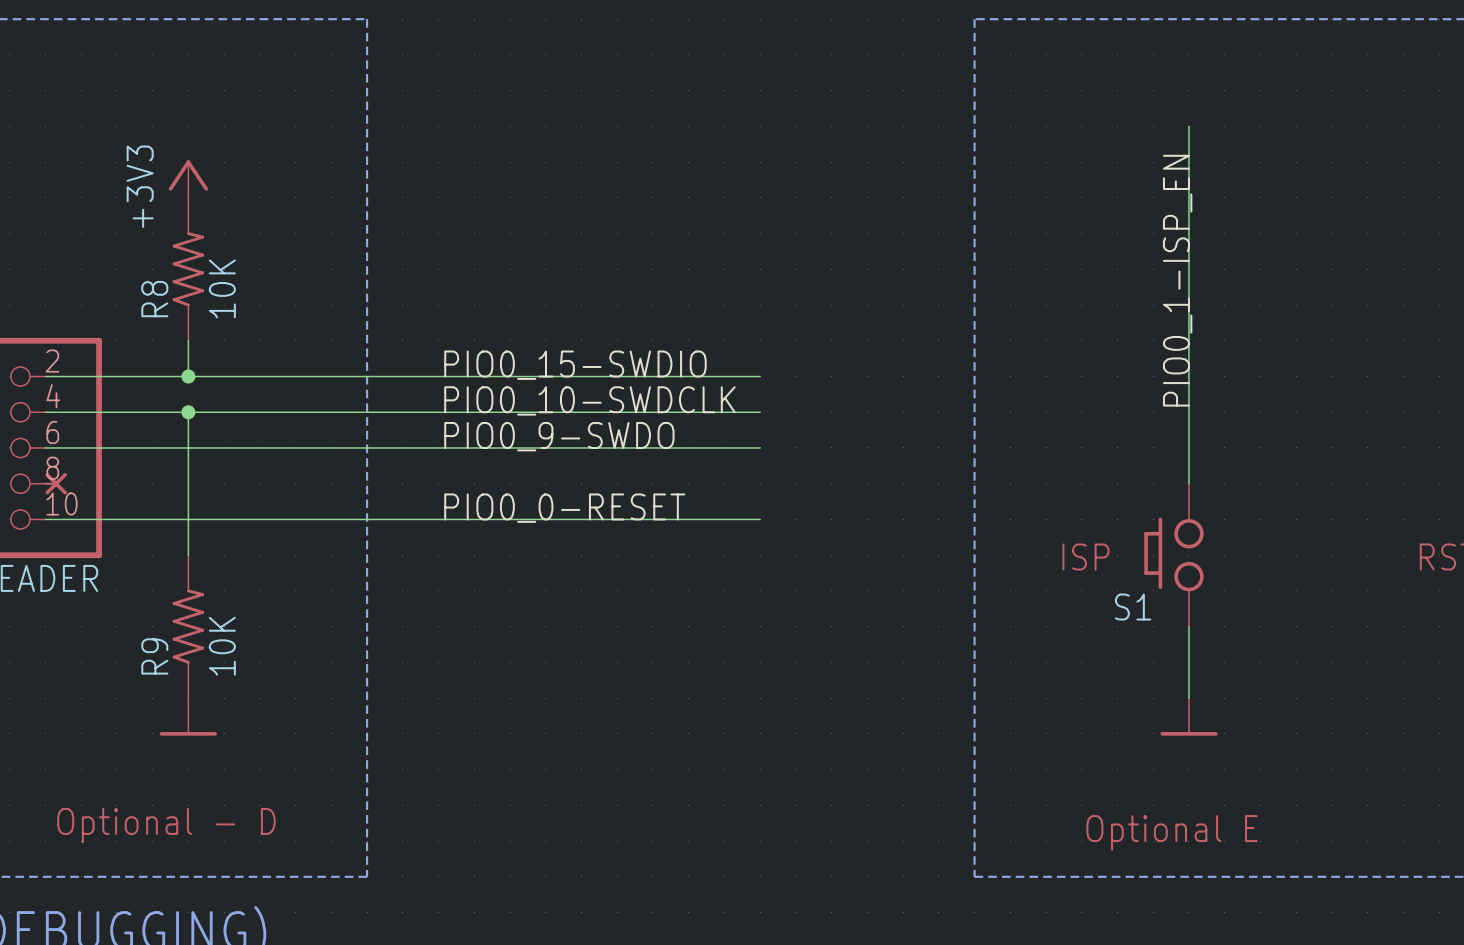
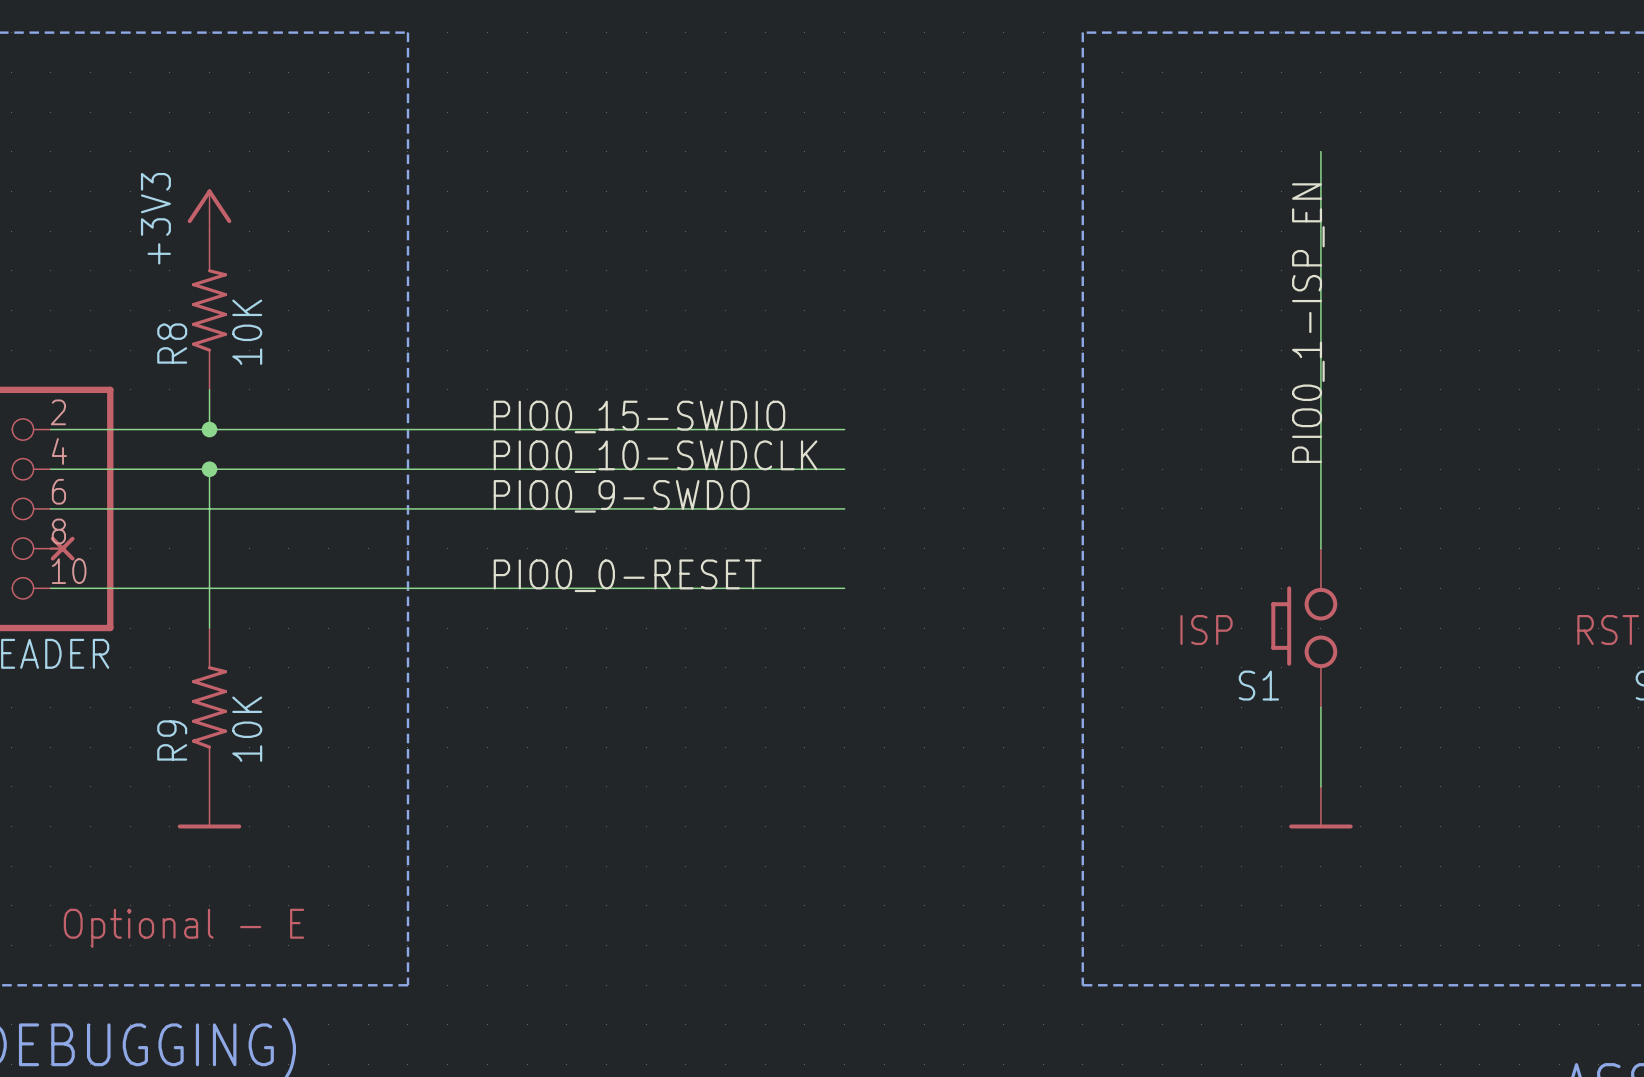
text: Optional - D (166, 825) -> Optional - E (183, 928)
text: Optional E (1172, 832) -> none

